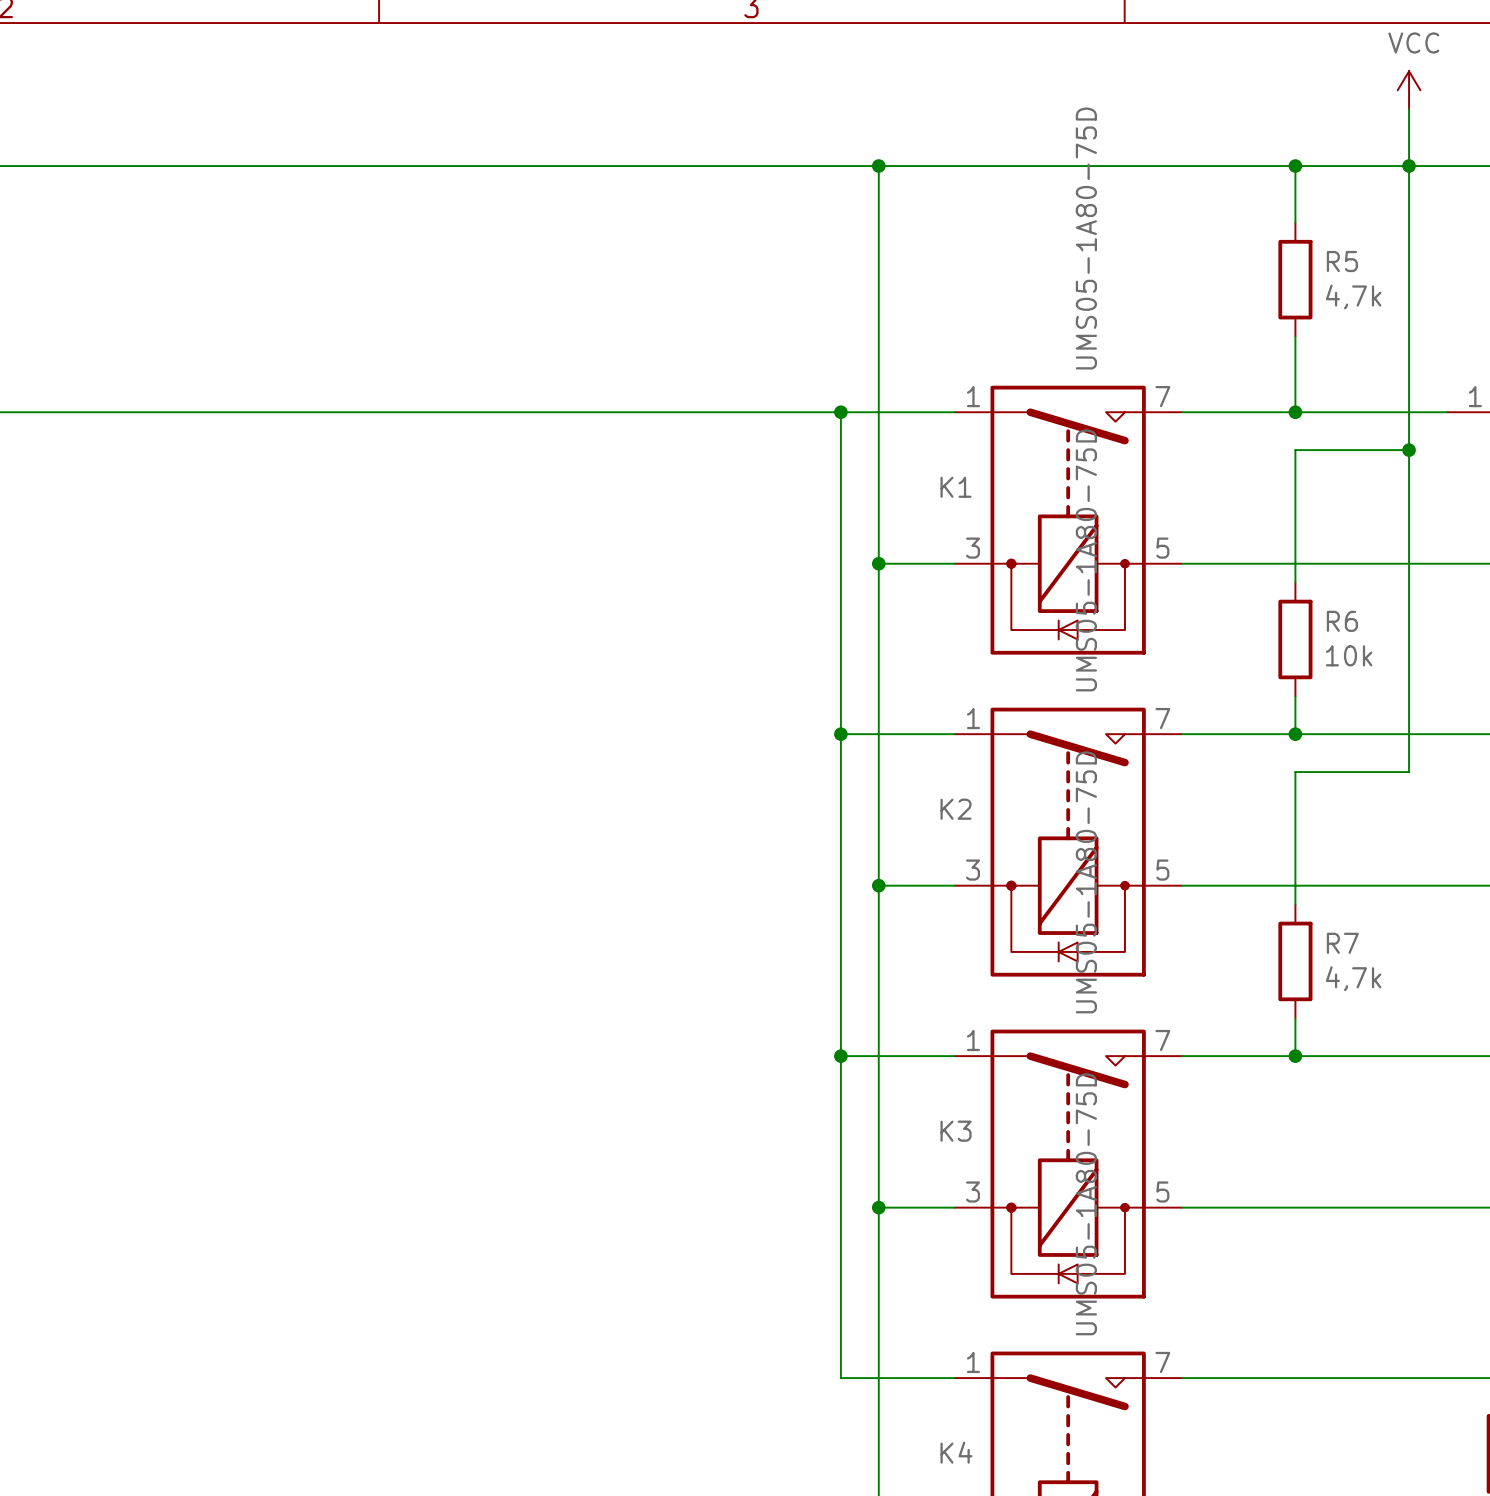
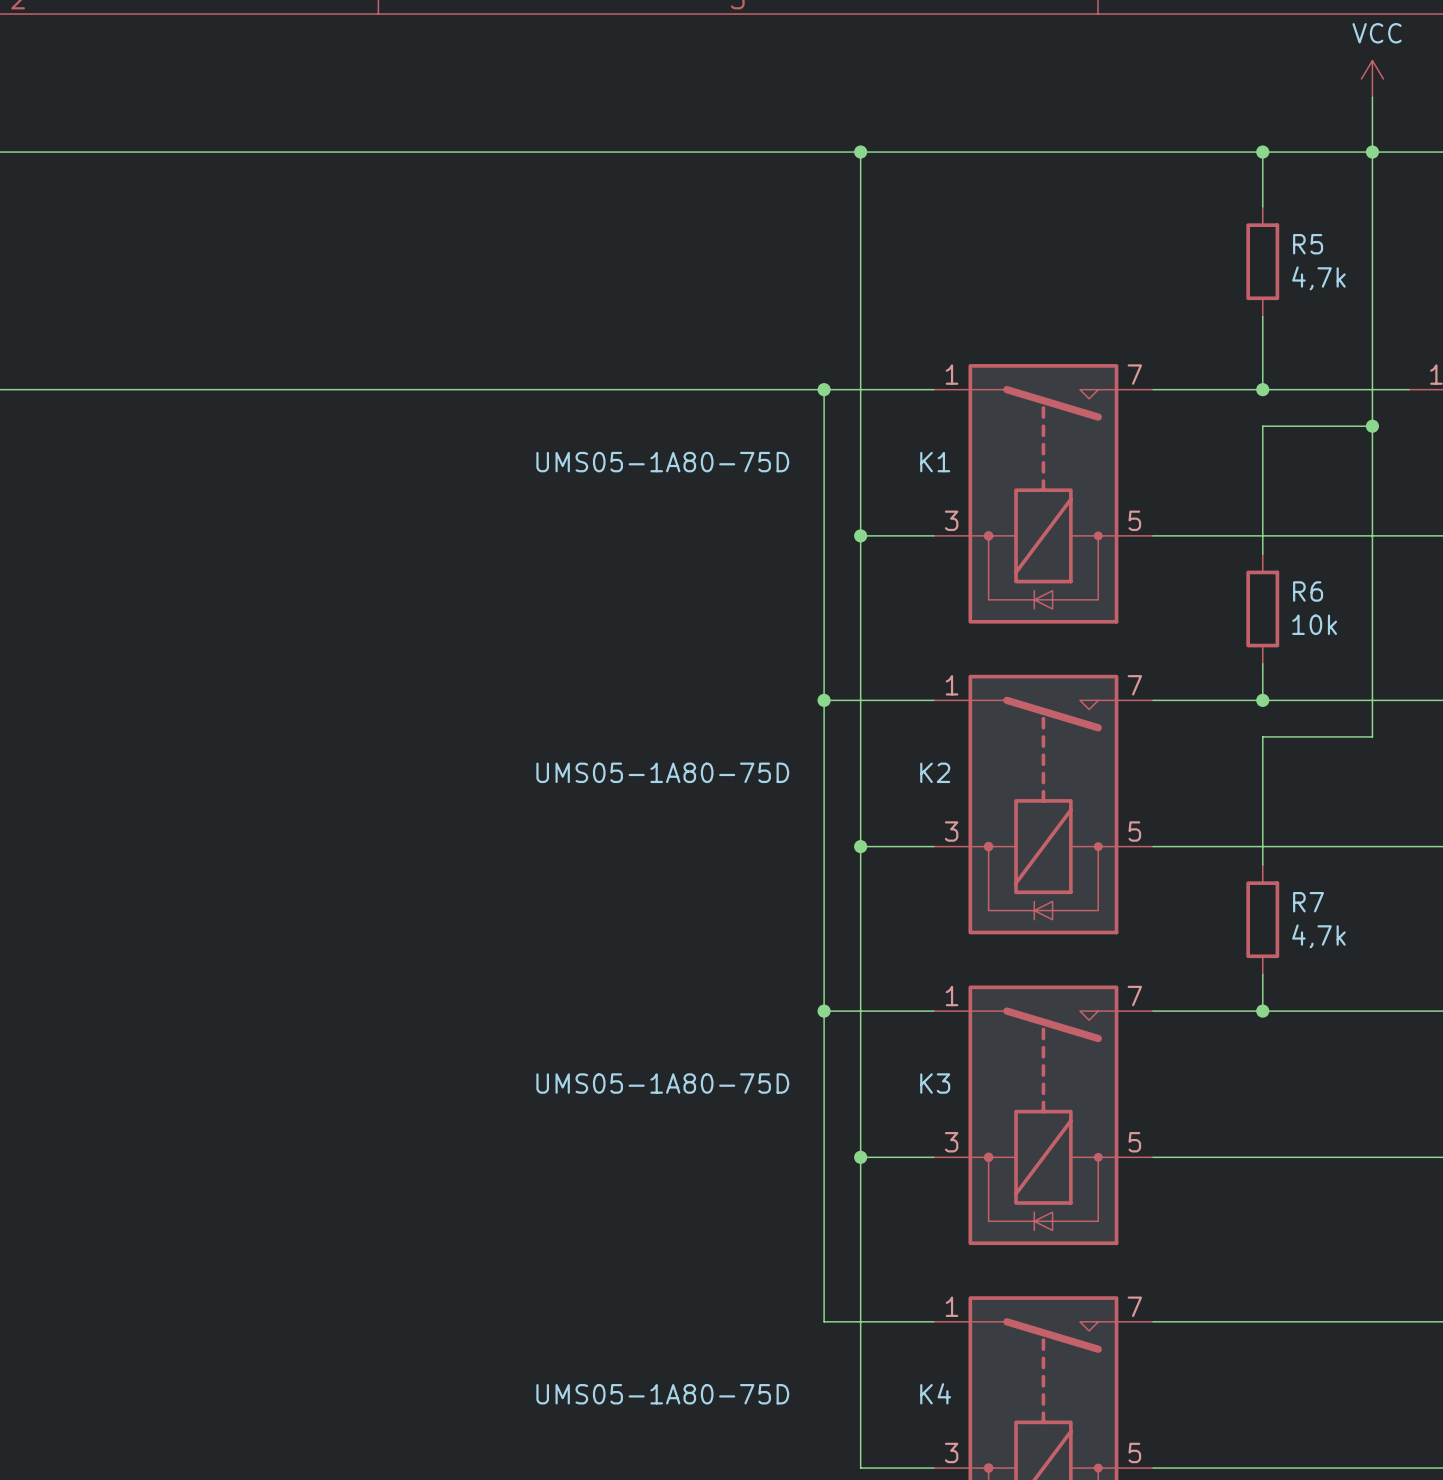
K1 value rotation: 0° (1086, 238) -> 90° clockwise (662, 462)
K1 value position: UMS05-1A80-75D (1086, 238) -> UMS05-1A80-75D (662, 462)
K2 value rotation: 0° (1086, 560) -> 90° clockwise (662, 772)
K2 value position: UMS05-1A80-75D (1086, 560) -> UMS05-1A80-75D (662, 772)
K3 value rotation: 0° (1086, 882) -> 90° clockwise (662, 1083)
K3 value position: UMS05-1A80-75D (1086, 882) -> UMS05-1A80-75D (662, 1083)
K4 value rotation: 0° (1086, 1204) -> 90° clockwise (662, 1394)
K4 value position: UMS05-1A80-75D (1086, 1204) -> UMS05-1A80-75D (662, 1394)

